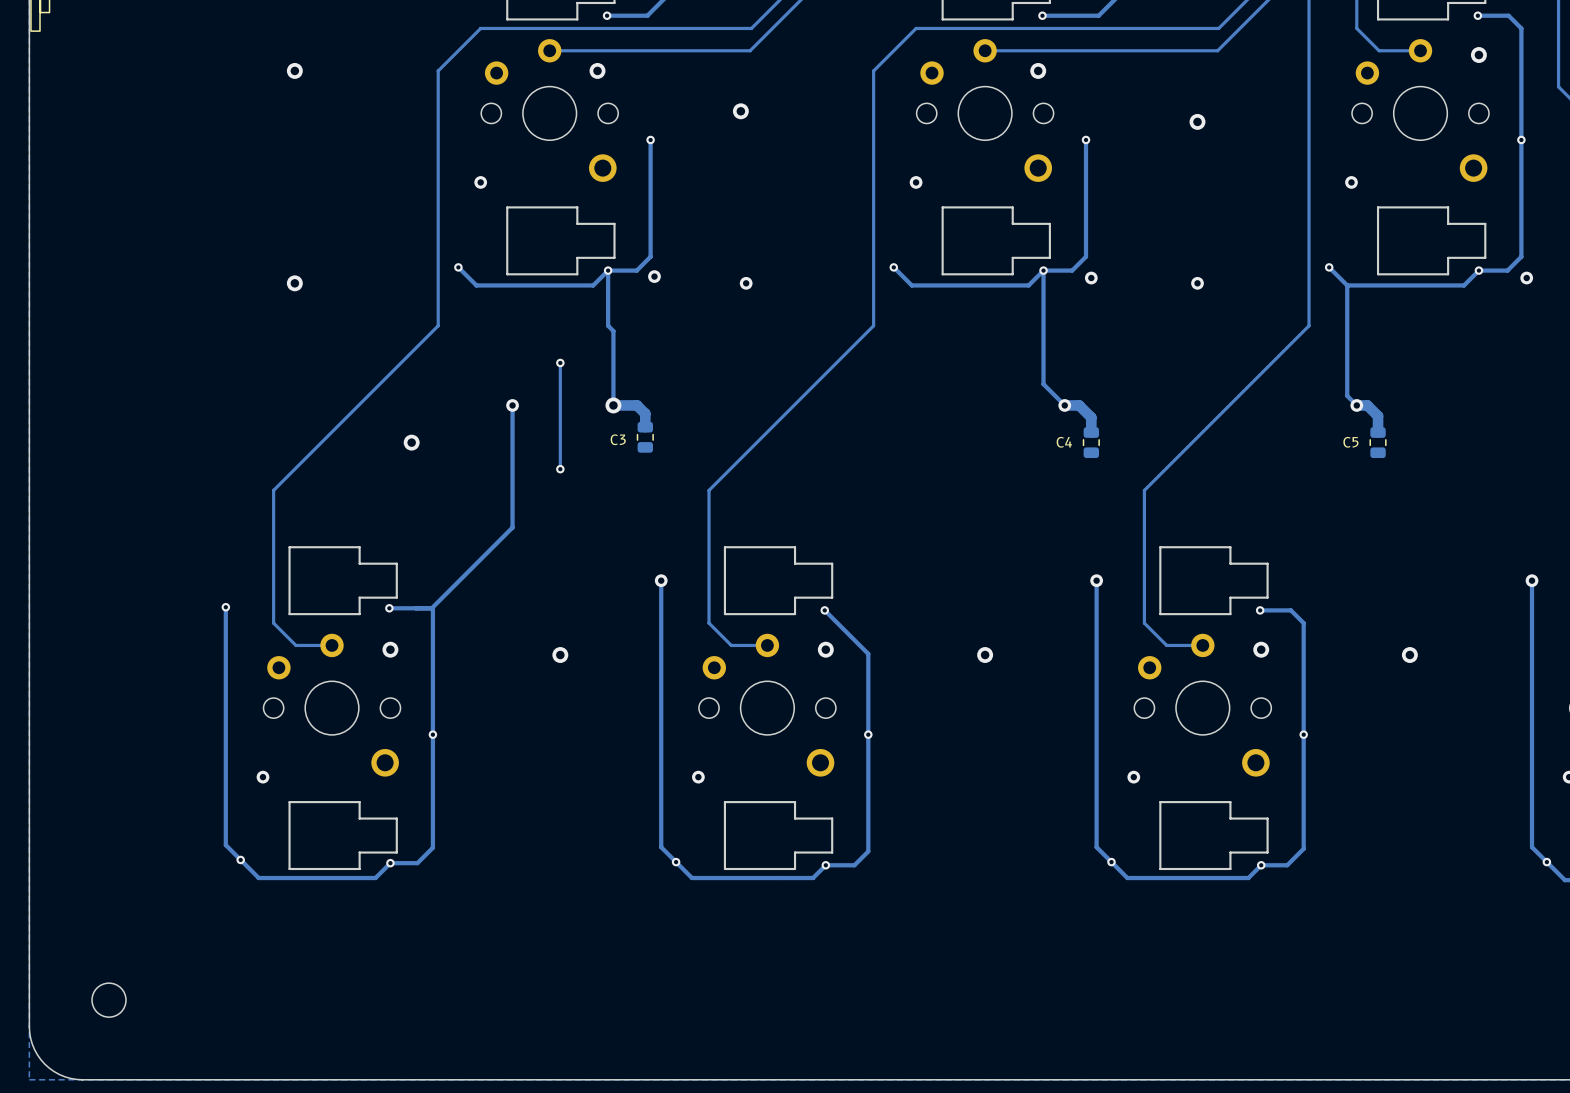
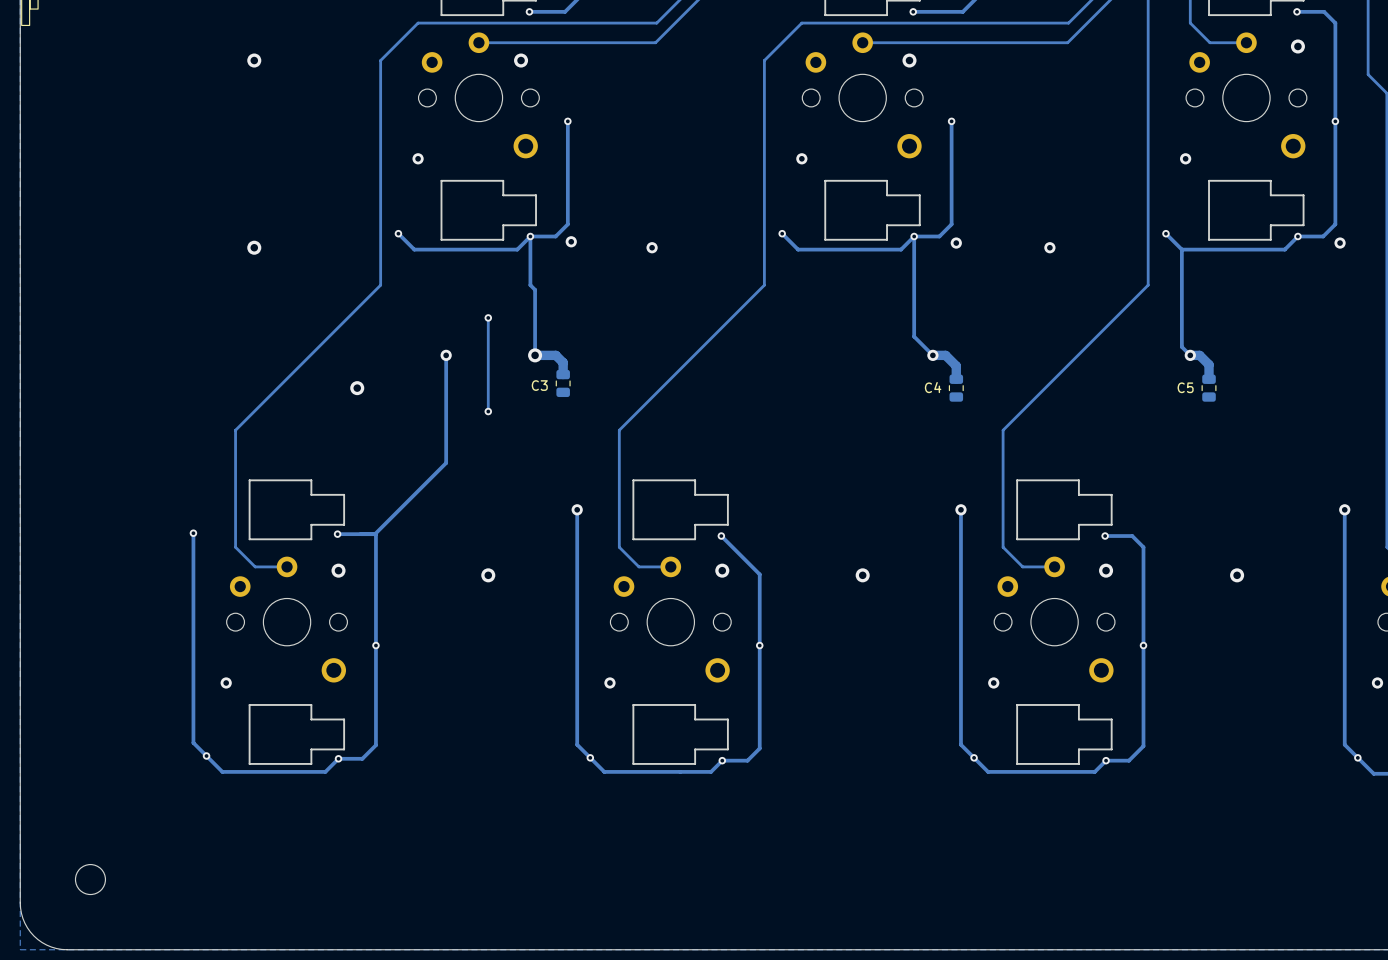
via: (740, 111) -> none
via: (1197, 121) -> none

